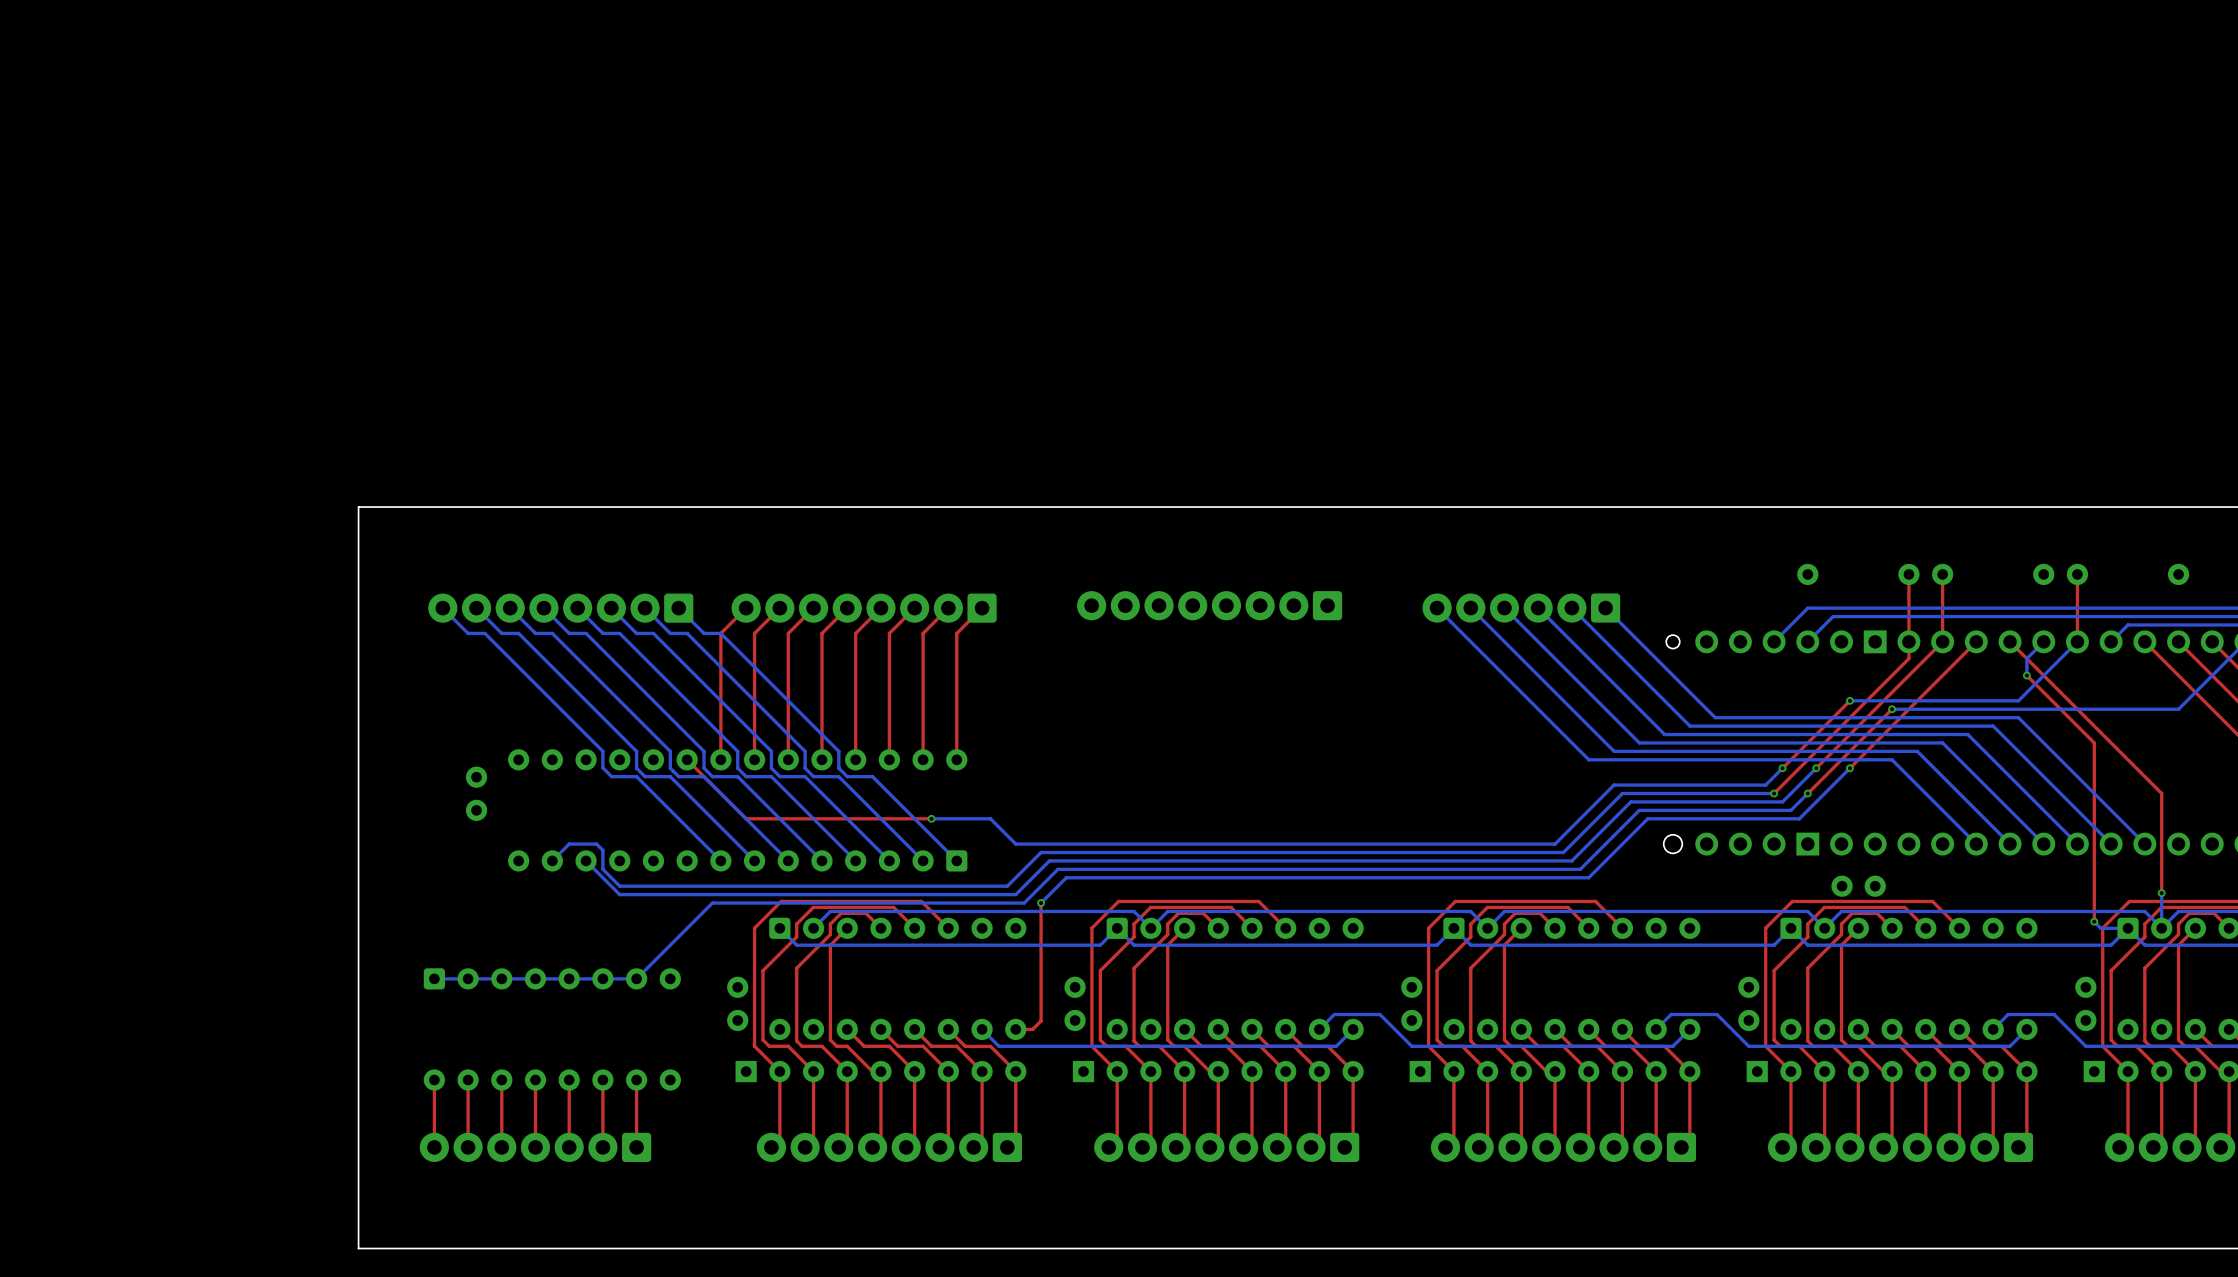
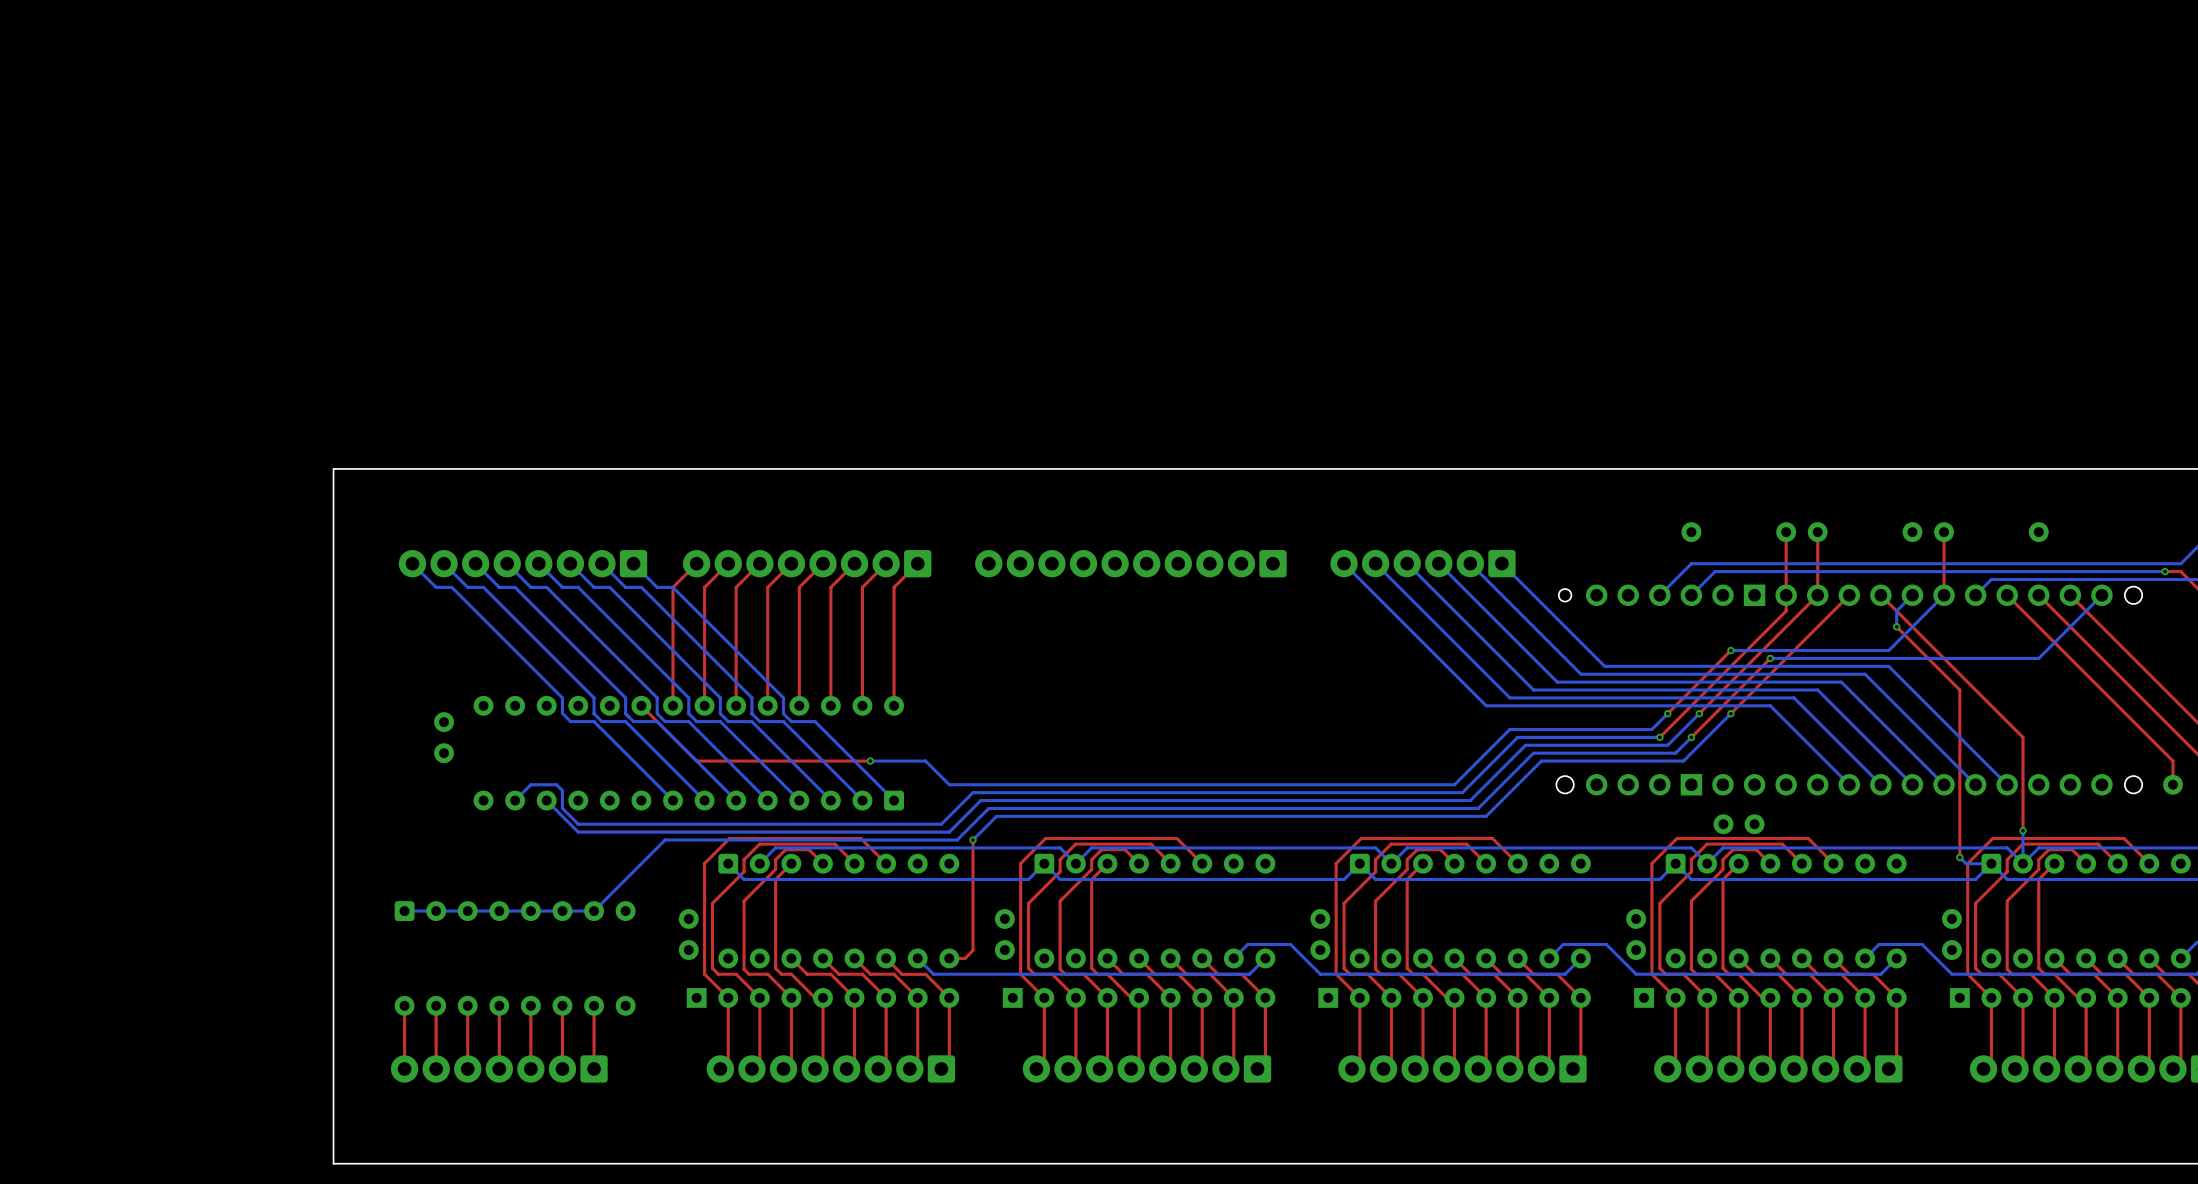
part footprint: [1077, 591, 1343, 621] -> [975, 550, 1287, 578]

